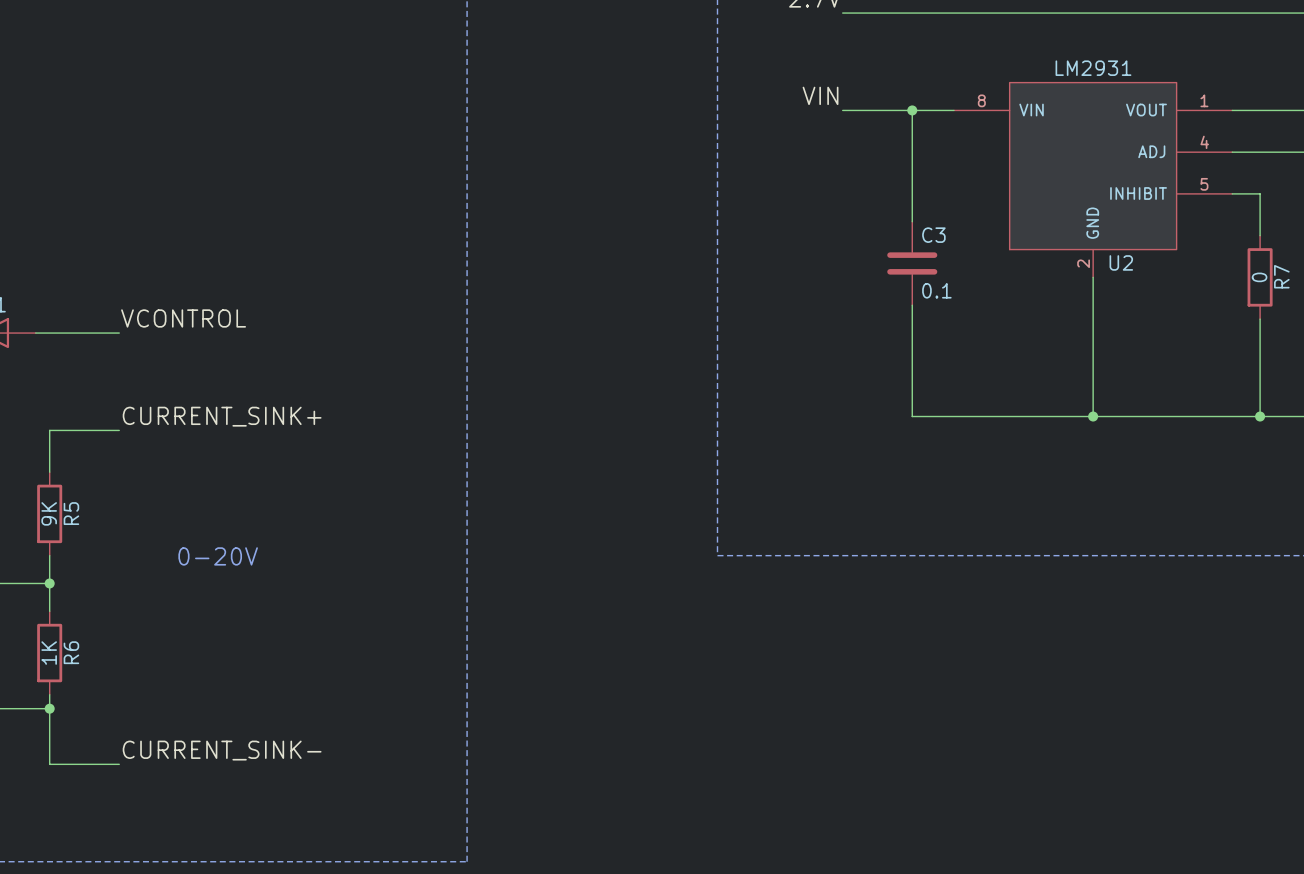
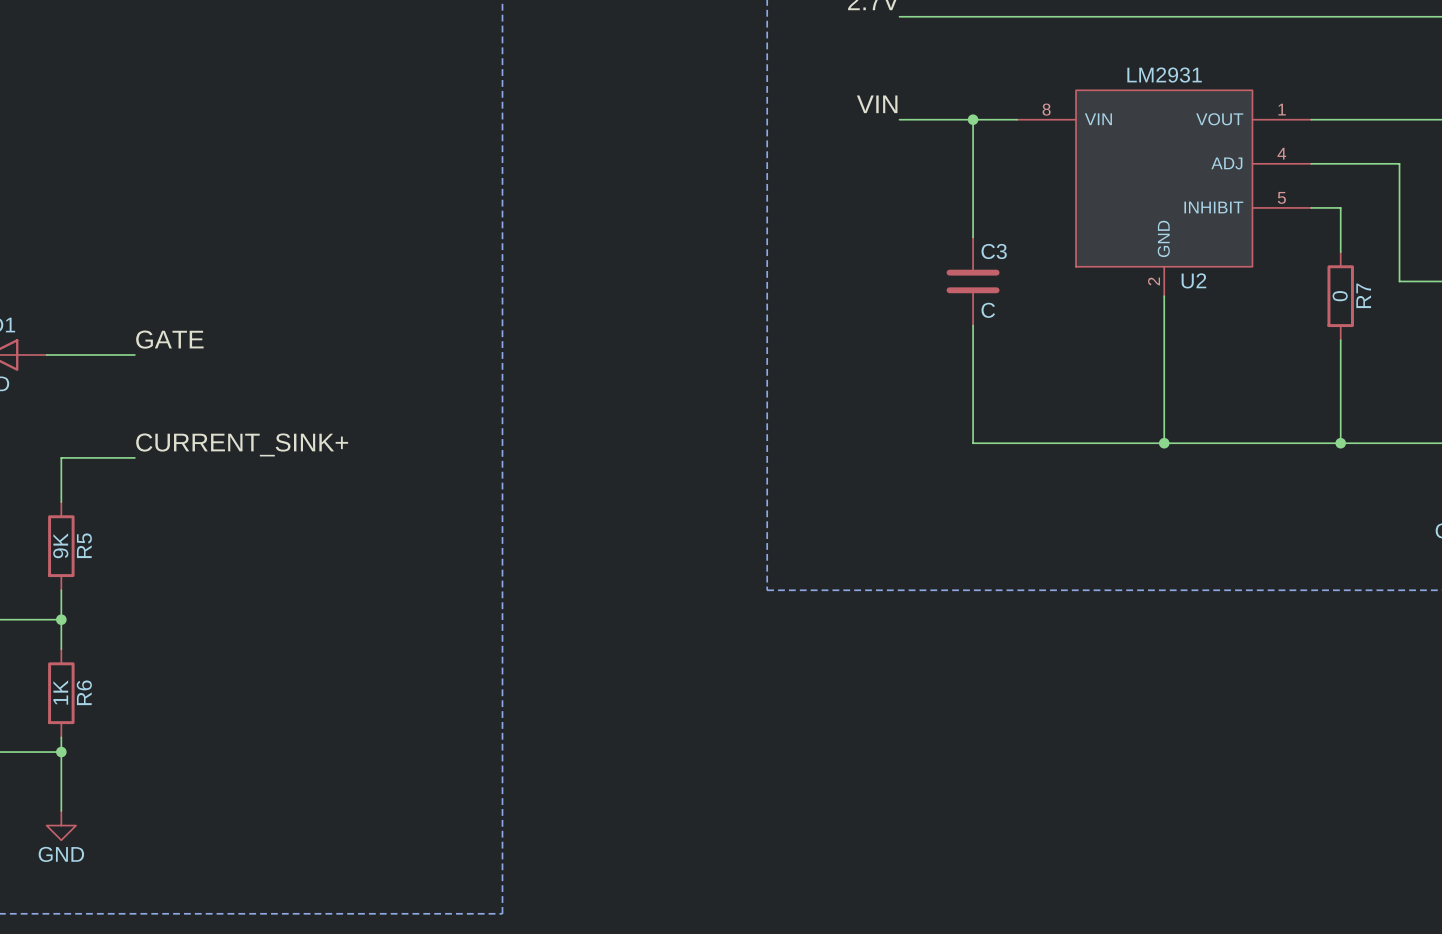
C3 value: 0.1 (936, 290) -> C (988, 310)
label: VCONTROL (183, 318) -> GATE (169, 339)
text: 0-20V (218, 556) -> none
label: CURRENT_SINK- (222, 750) -> none
wire: (49, 764) (119, 764) -> none
power symbol: none -> GND (61, 825)

